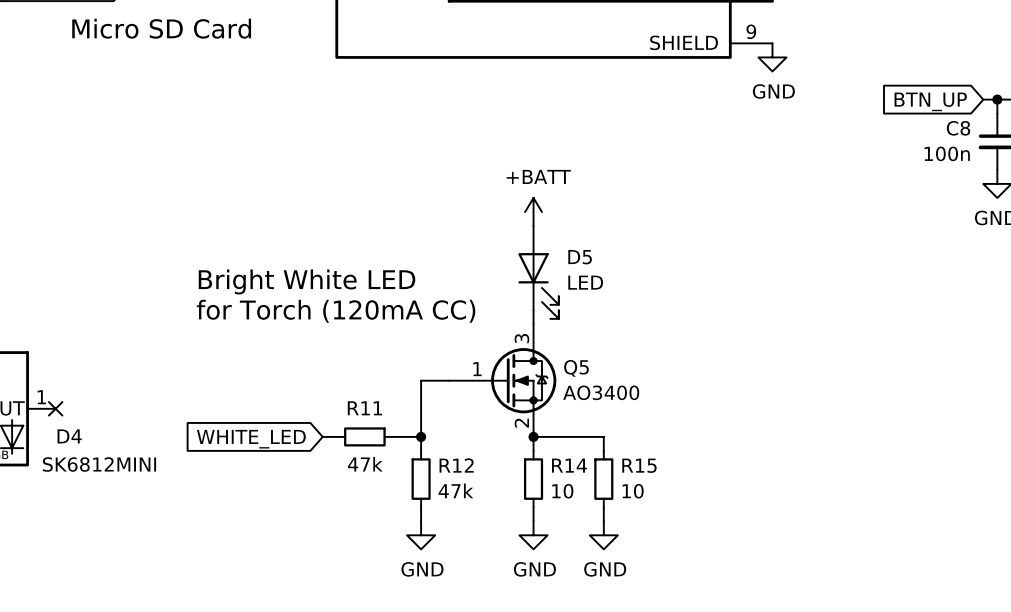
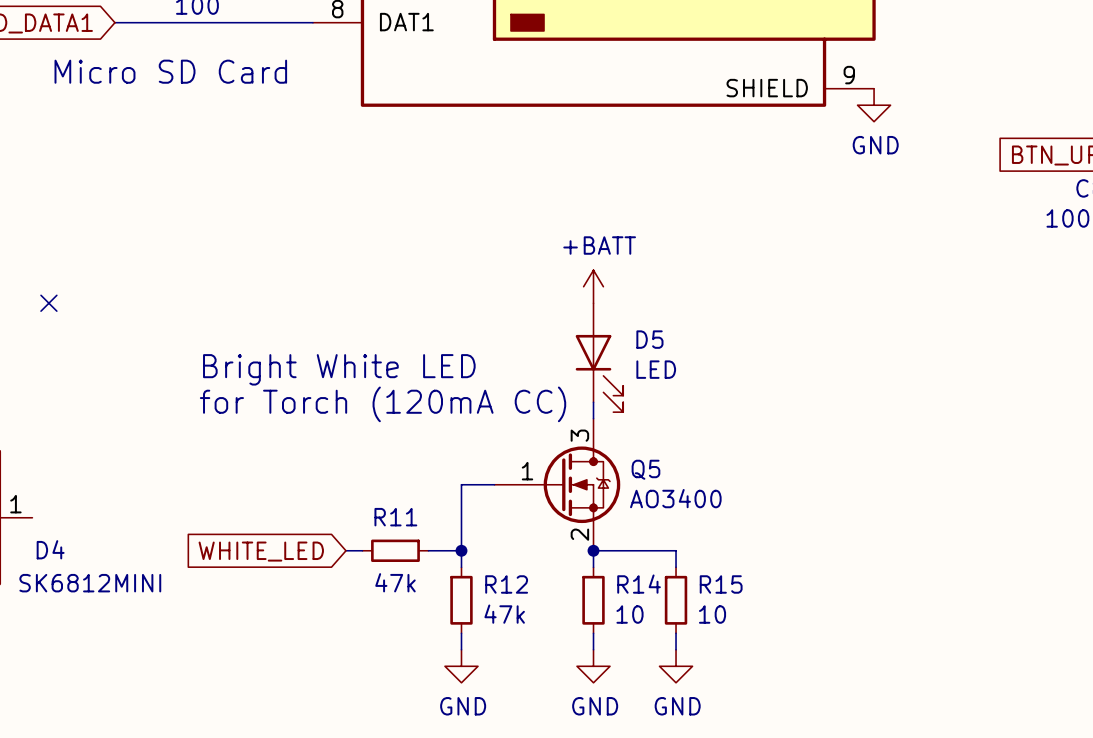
no-connect mark: none -> (48, 303)
no-connect mark: (55, 408) -> none

